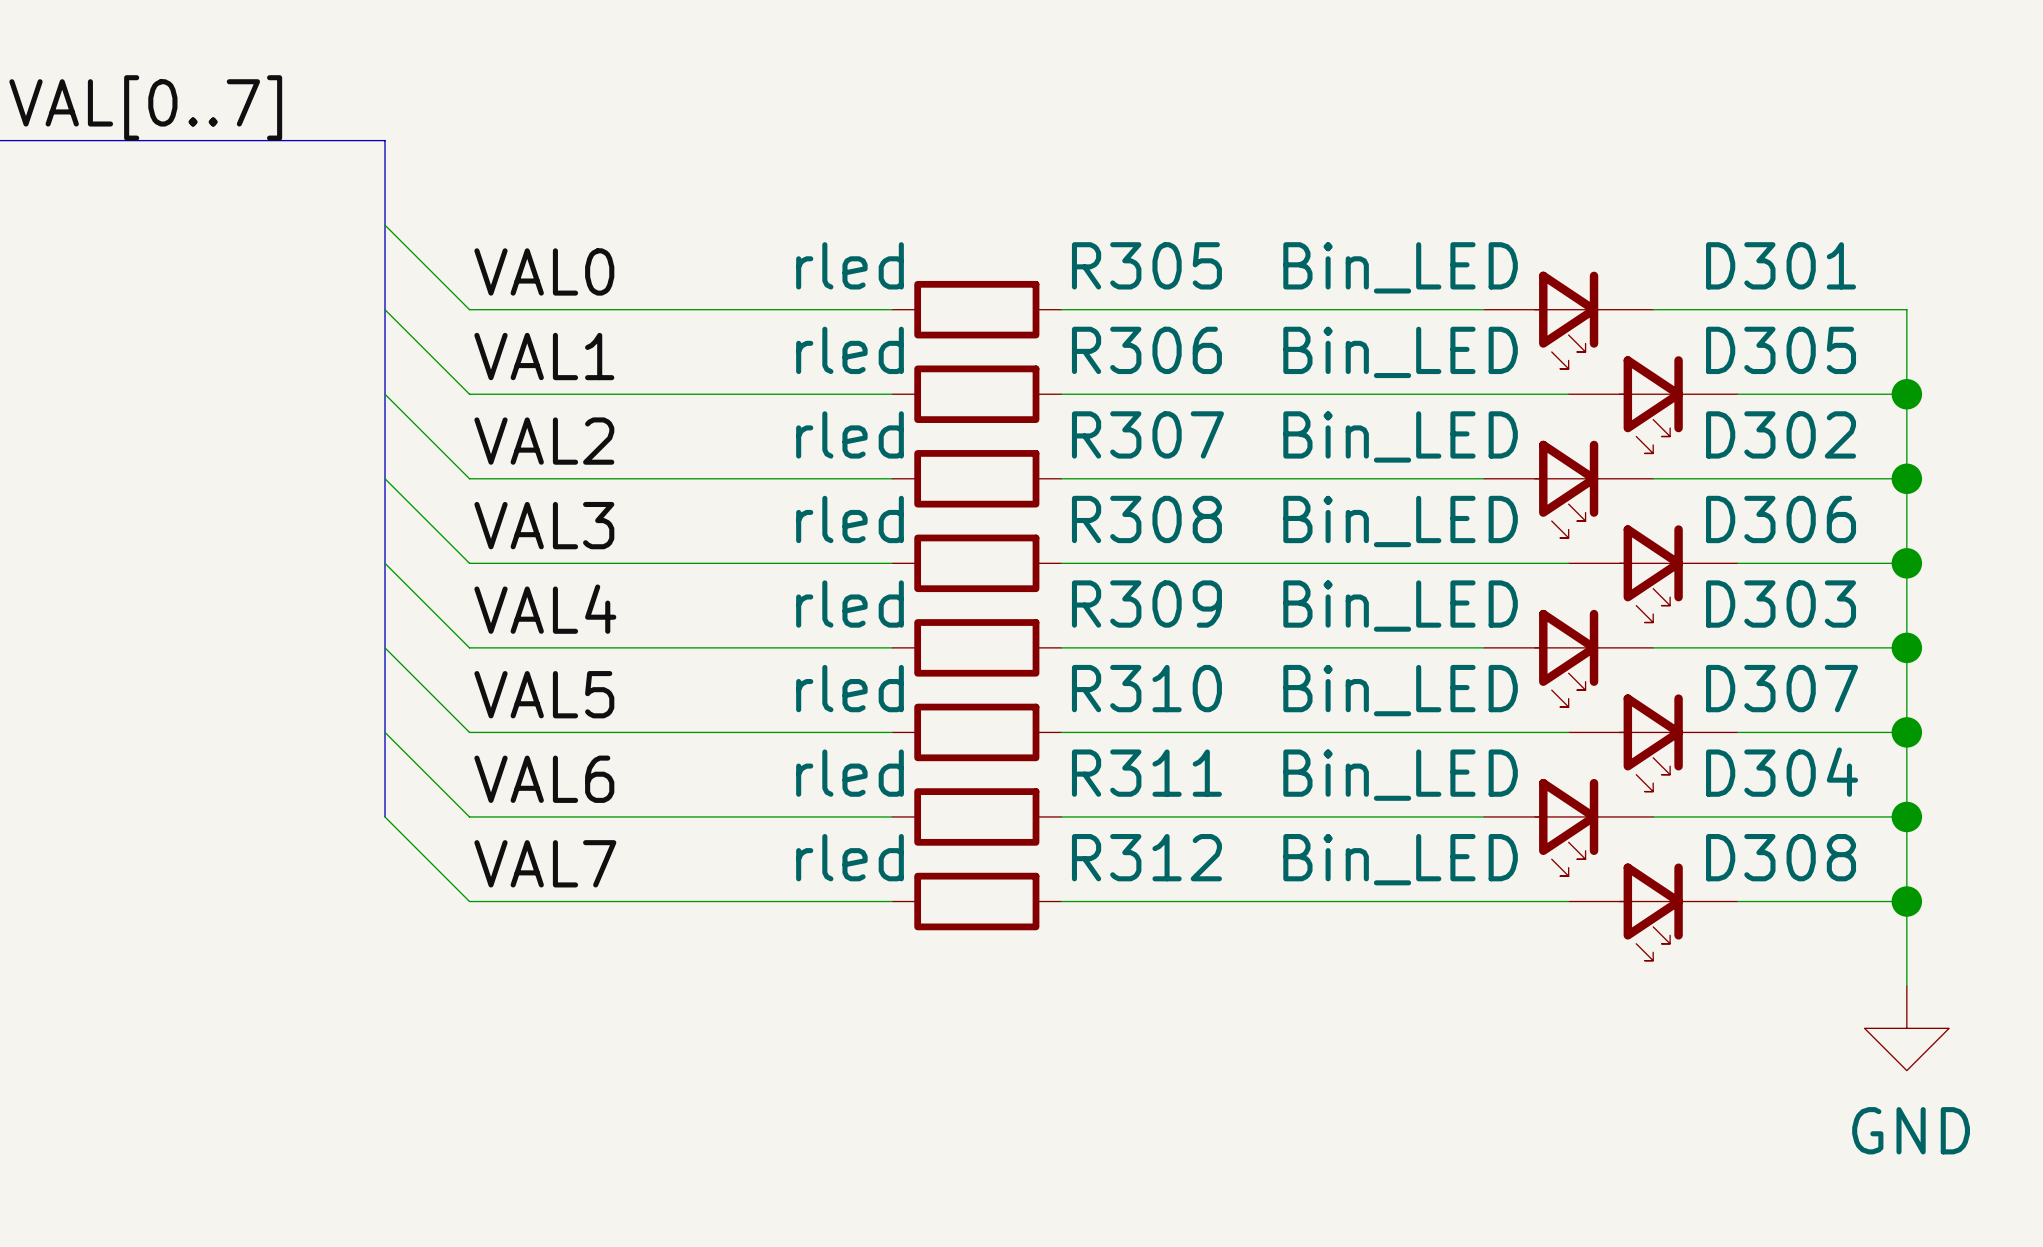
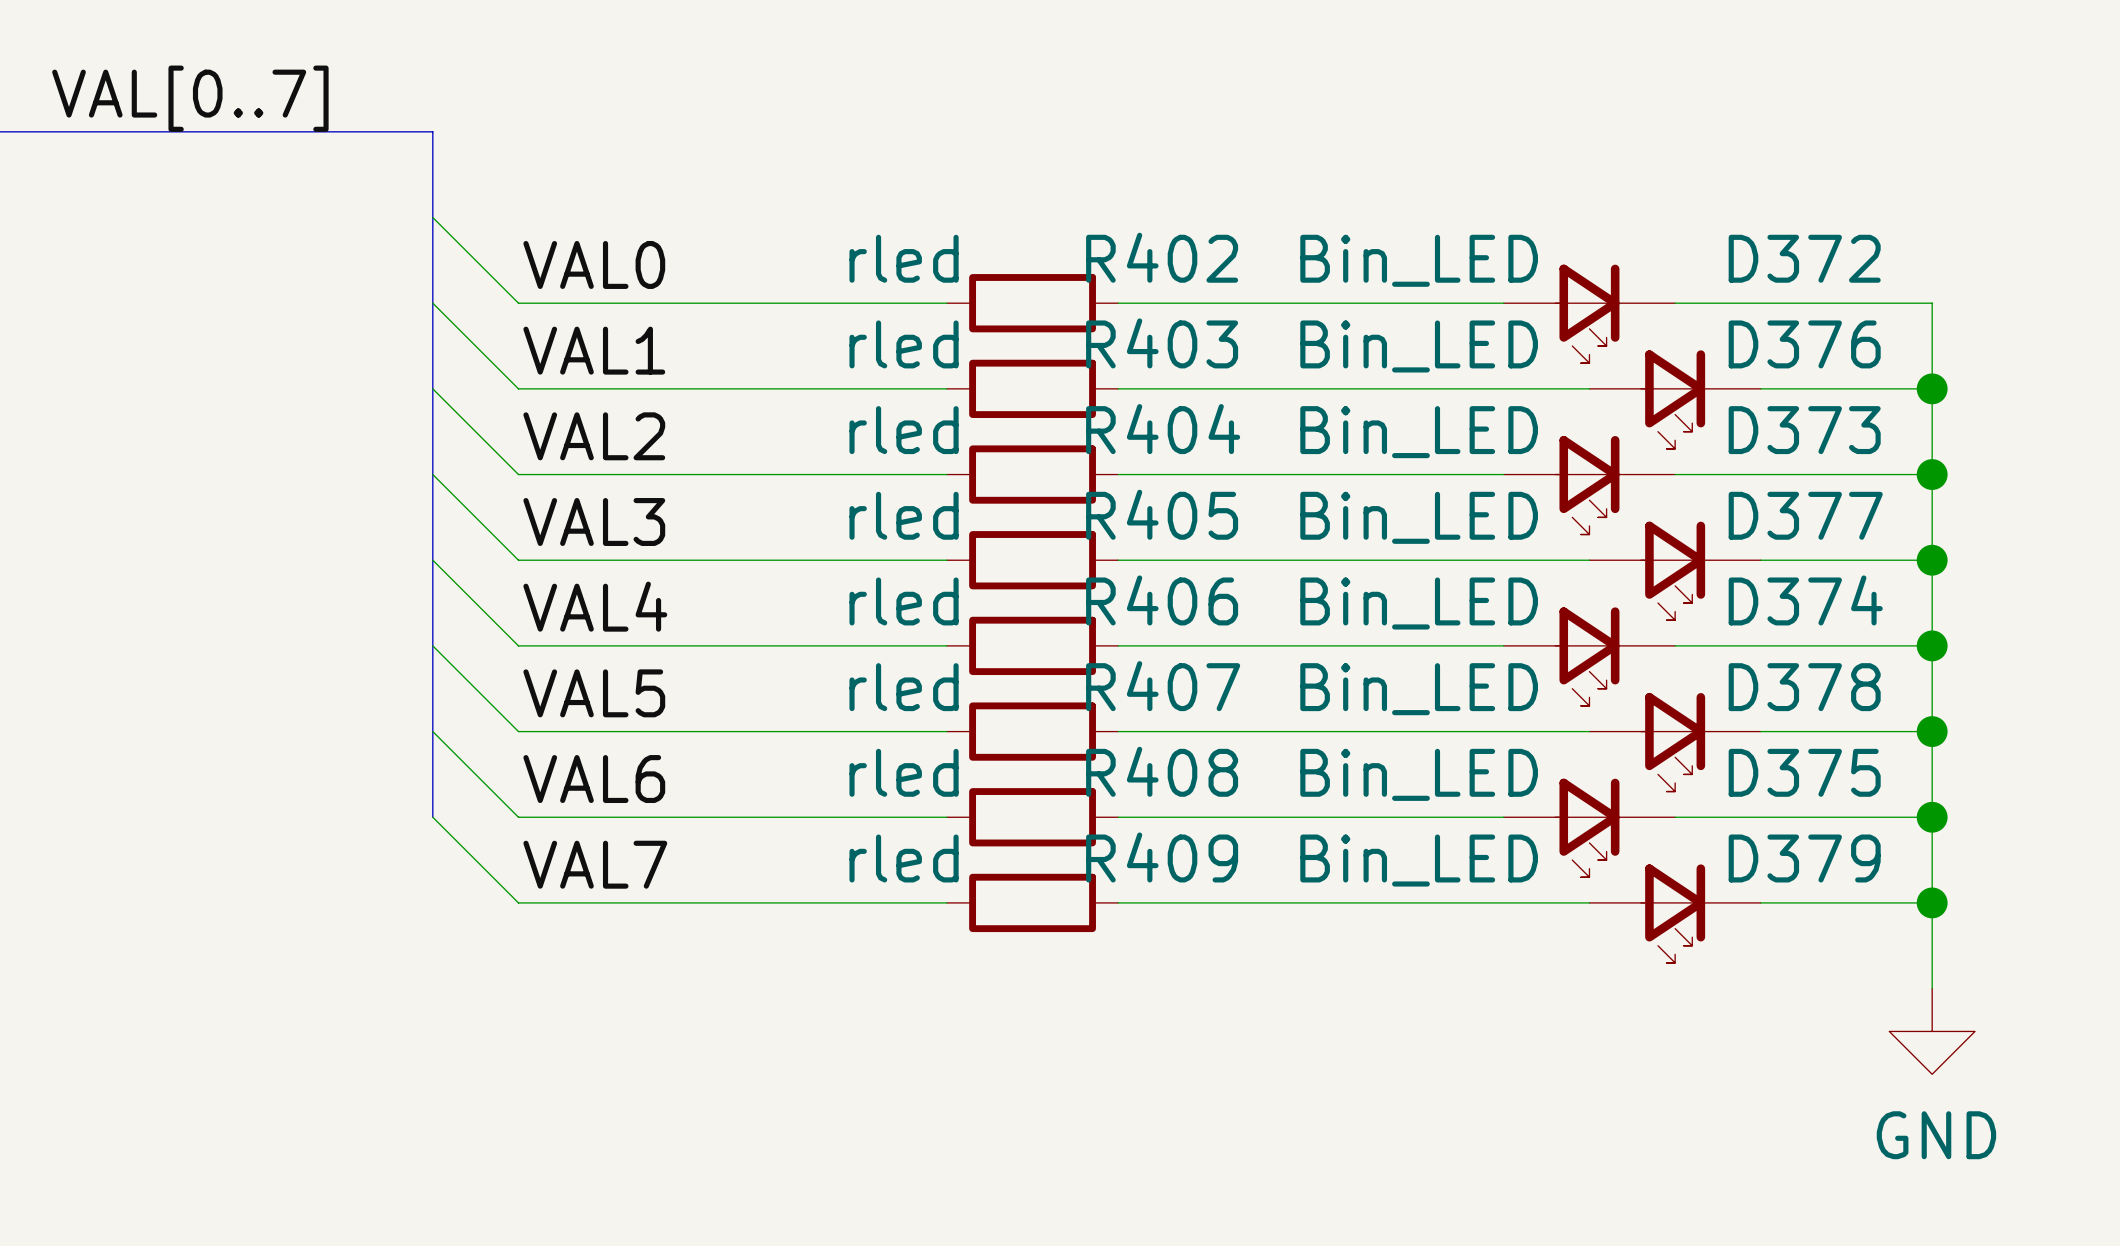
R305 name: R305 (1146, 265) -> R402 (1162, 257)
wire: (1864, 309) (1906, 309) (1906, 986) -> (1932, 303) (1932, 988)
D372: none -> Bin_LED (1589, 313)
D301: Bin_LED (1568, 320) -> none
R306 name: R306 (1146, 350) -> R403 (1162, 343)
wire: (1864, 394) (1906, 394) -> none
junction position: (1906, 394) -> (1932, 388)
D376: none -> Bin_LED (1675, 399)
D305: Bin_LED (1653, 404) -> none
R307 name: R307 (1147, 434) -> R404 (1163, 429)
wire: (1864, 478) (1906, 478) -> none
junction position: (1906, 478) -> (1932, 474)
D373: none -> Bin_LED (1589, 485)
D302: Bin_LED (1568, 489) -> none
R308 name: R308 (1146, 519) -> R405 (1162, 514)
wire: (1864, 563) (1906, 563) -> none
junction position: (1906, 563) -> (1932, 560)
D377: none -> Bin_LED (1675, 570)
D306: Bin_LED (1653, 573) -> none
R309 name: R309 (1146, 604) -> R406 (1162, 600)
wire: (1864, 647) (1906, 647) -> none
junction position: (1906, 647) -> (1932, 645)
D374: none -> Bin_LED (1589, 656)
D303: Bin_LED (1568, 658) -> none
R310 name: R310 (1146, 688) -> R407 (1163, 686)
wire: (1864, 732) (1906, 732) -> none
junction position: (1906, 732) -> (1932, 731)
D378: none -> Bin_LED (1675, 742)
D307: Bin_LED (1653, 743) -> none
R311 name: R311 (1146, 773) -> R408 (1162, 771)
wire: (1864, 816) (1906, 816) -> none
junction position: (1906, 816) -> (1932, 817)
D375: none -> Bin_LED (1589, 827)
D304: Bin_LED (1568, 827) -> none
R312 name: R312 (1146, 857) -> R409 (1162, 857)
wire: (1864, 901) (1906, 901) -> none
junction position: (1906, 901) -> (1932, 902)
D379: none -> Bin_LED (1675, 913)
D308: Bin_LED (1653, 912) -> none
power symbol position: GND (1906, 1028) -> GND (1932, 1031)

